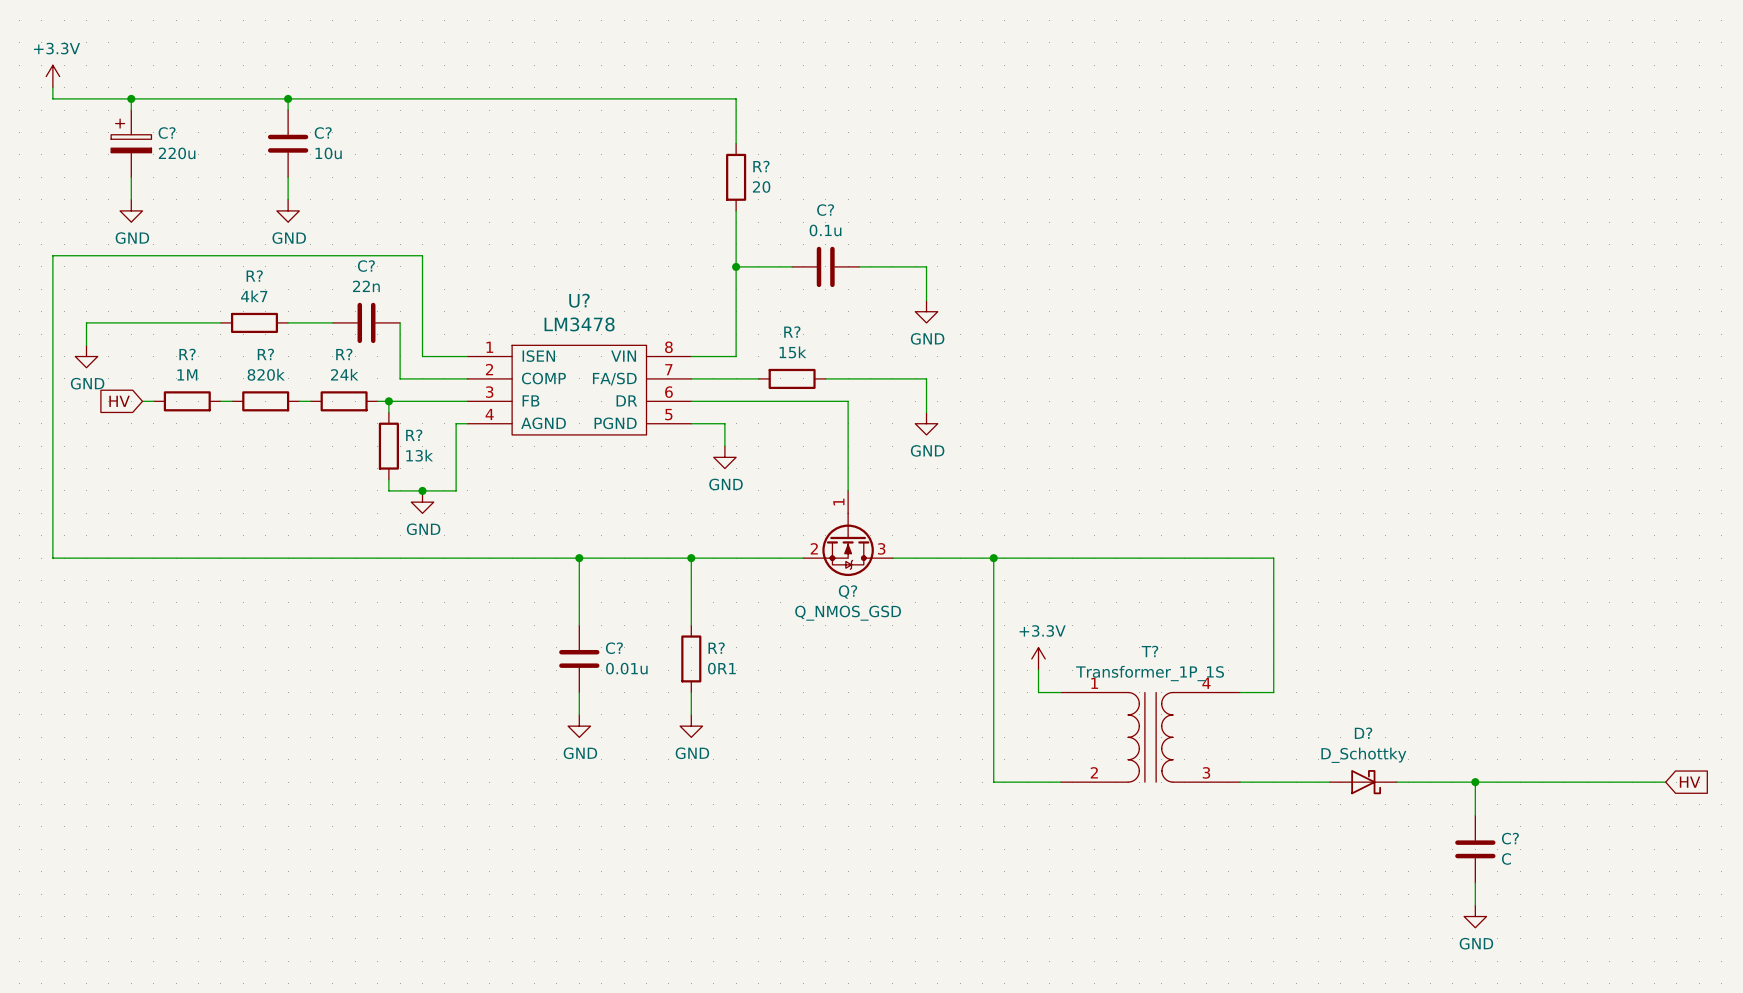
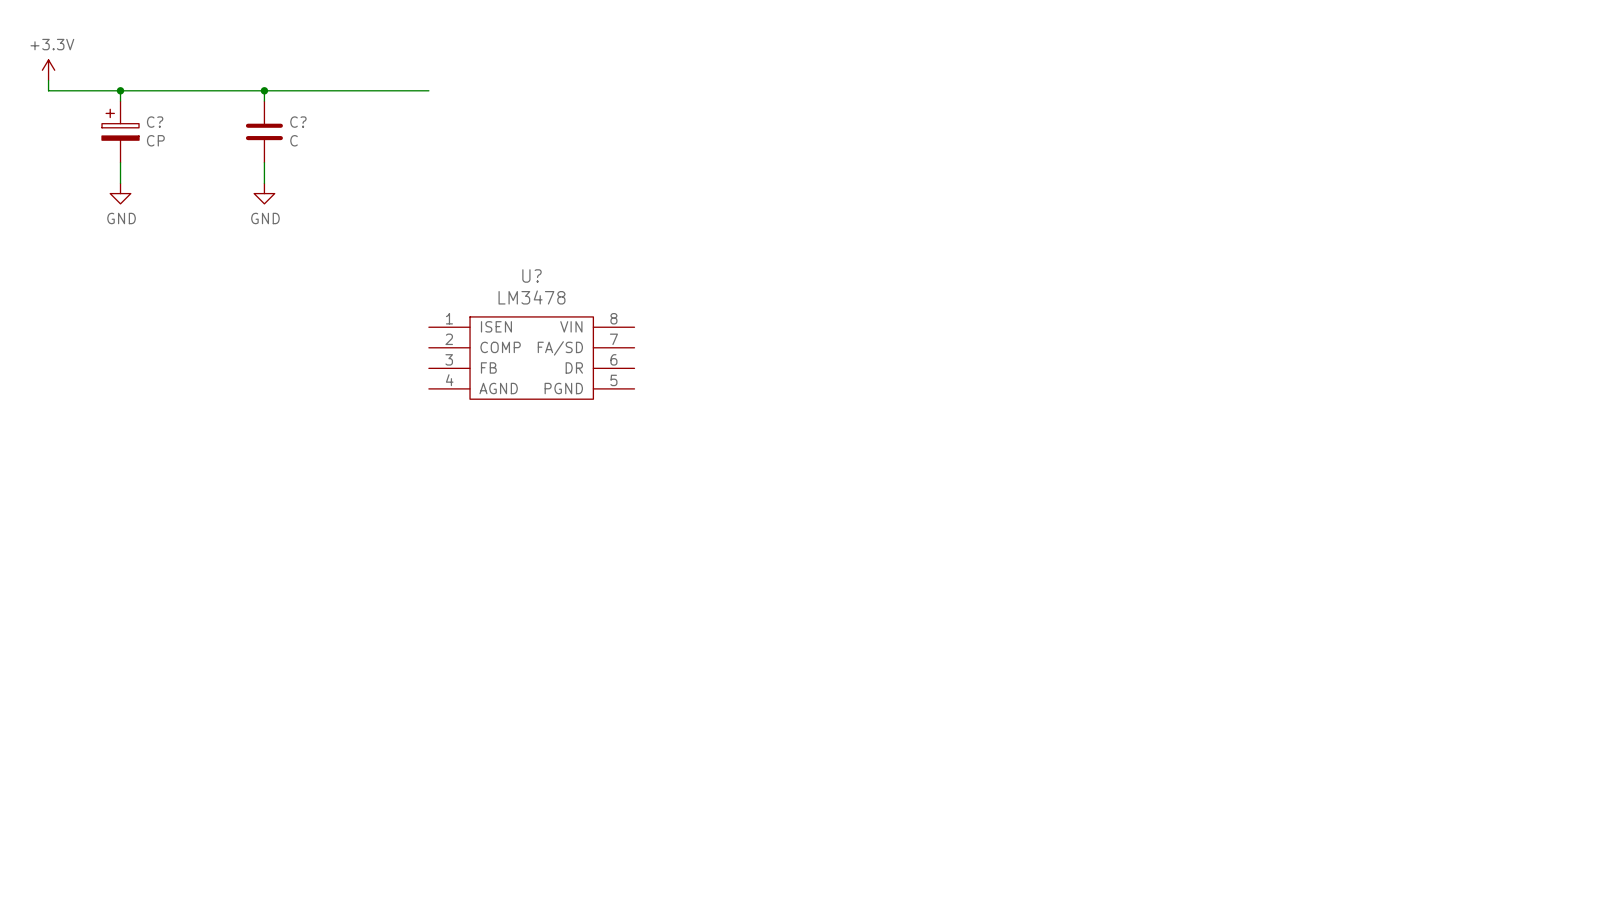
wire: (467, 98) (736, 98) (736, 143) -> none
C? value: 220u (177, 153) -> CP (155, 140)
C? value: 10u (328, 153) -> C (294, 140)
R?: 20 (736, 177) -> none
wire: (736, 210) (736, 356) (691, 356) -> none
wire: (736, 266) (792, 266) -> none
junction: (736, 266) -> none
C?: 0.1u (825, 266) -> none
wire: (859, 266) (926, 266) (926, 300) -> none
power symbol: GND (926, 311) -> none
wire: (220, 322) (86, 322) (86, 345) -> none
R?: 4k7 (254, 322) -> none
wire: (288, 322) (332, 322) -> none
C?: 22n (366, 322) -> none
wire: (400, 322) (400, 378) (467, 378) -> none
power symbol: GND (86, 356) -> none
wire: (467, 356) (422, 356) (422, 255) (52, 255) (52, 558) (803, 558) -> none
wire: (691, 378) (758, 378) -> none
R?: 15k (792, 378) -> none
wire: (825, 378) (926, 378) (926, 412) -> none
global label: HV (119, 401) -> none
wire: (142, 401) (153, 401) -> none
R?: 1M (187, 401) -> none
wire: (220, 401) (232, 401) -> none
R?: 820k (265, 401) -> none
wire: (299, 401) (310, 401) -> none
R?: 24k (344, 401) -> none
wire: (377, 401) (467, 401) -> none
wire: (388, 401) (388, 412) -> none
junction: (388, 401) -> none
wire: (691, 401) (848, 401) (848, 490) -> none
wire: (467, 423) (456, 423) (456, 490) (388, 490) (388, 479) -> none
wire: (691, 423) (724, 423) (724, 446) -> none
power symbol: GND (926, 423) -> none
R?: 13k (388, 446) -> none
power symbol: GND (724, 457) -> none
junction: (422, 490) -> none
power symbol: GND (422, 502) -> none
Q?: Q_NMOS_GSD (848, 533) -> none
wire: (579, 558) (579, 625) -> none
junction: (579, 558) -> none
wire: (691, 558) (691, 625) -> none
junction: (691, 558) -> none
wire: (892, 558) (1273, 558) (1273, 692) (1240, 692) -> none
wire: (993, 558) (993, 782) (1060, 782) -> none
junction: (993, 558) -> none
C?: 0.01u (579, 658) -> none
R?: 0R1 (691, 658) -> none
power symbol: +3.3V (1038, 658) -> none
wire: (1038, 670) (1038, 692) (1060, 692) -> none
wire: (579, 692) (579, 714) -> none
wire: (691, 692) (691, 714) -> none
power symbol: GND (579, 726) -> none
power symbol: GND (691, 726) -> none
T?: Transformer_1P_1S (1150, 737) -> none
wire: (1240, 782) (1329, 782) -> none
D?: D_Schottky (1363, 782) -> none
wire: (1396, 782) (1665, 782) -> none
wire: (1475, 782) (1475, 815) -> none
junction: (1475, 782) -> none
global label: HV (1690, 782) -> none
C?: C (1475, 849) -> none
wire: (1475, 882) (1475, 905) -> none
power symbol: GND (1475, 916) -> none

